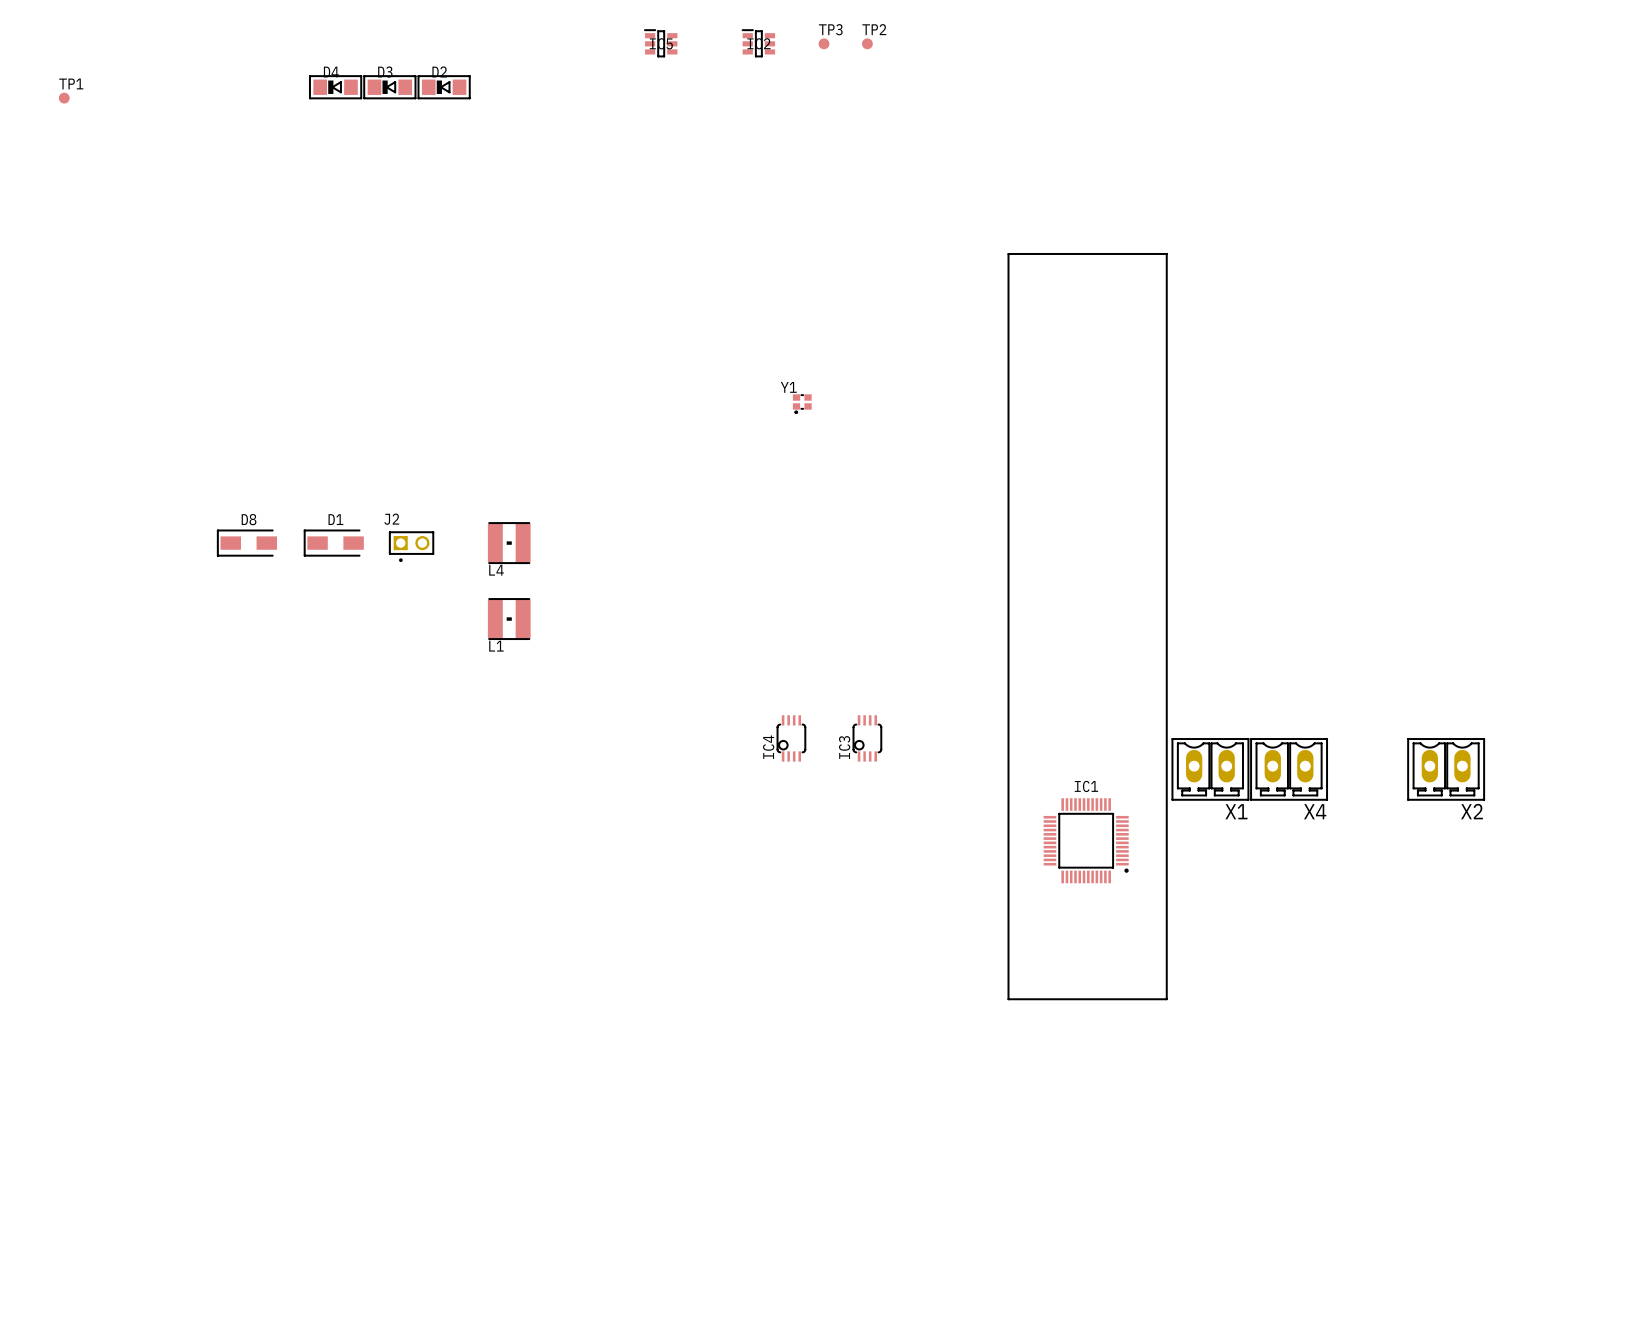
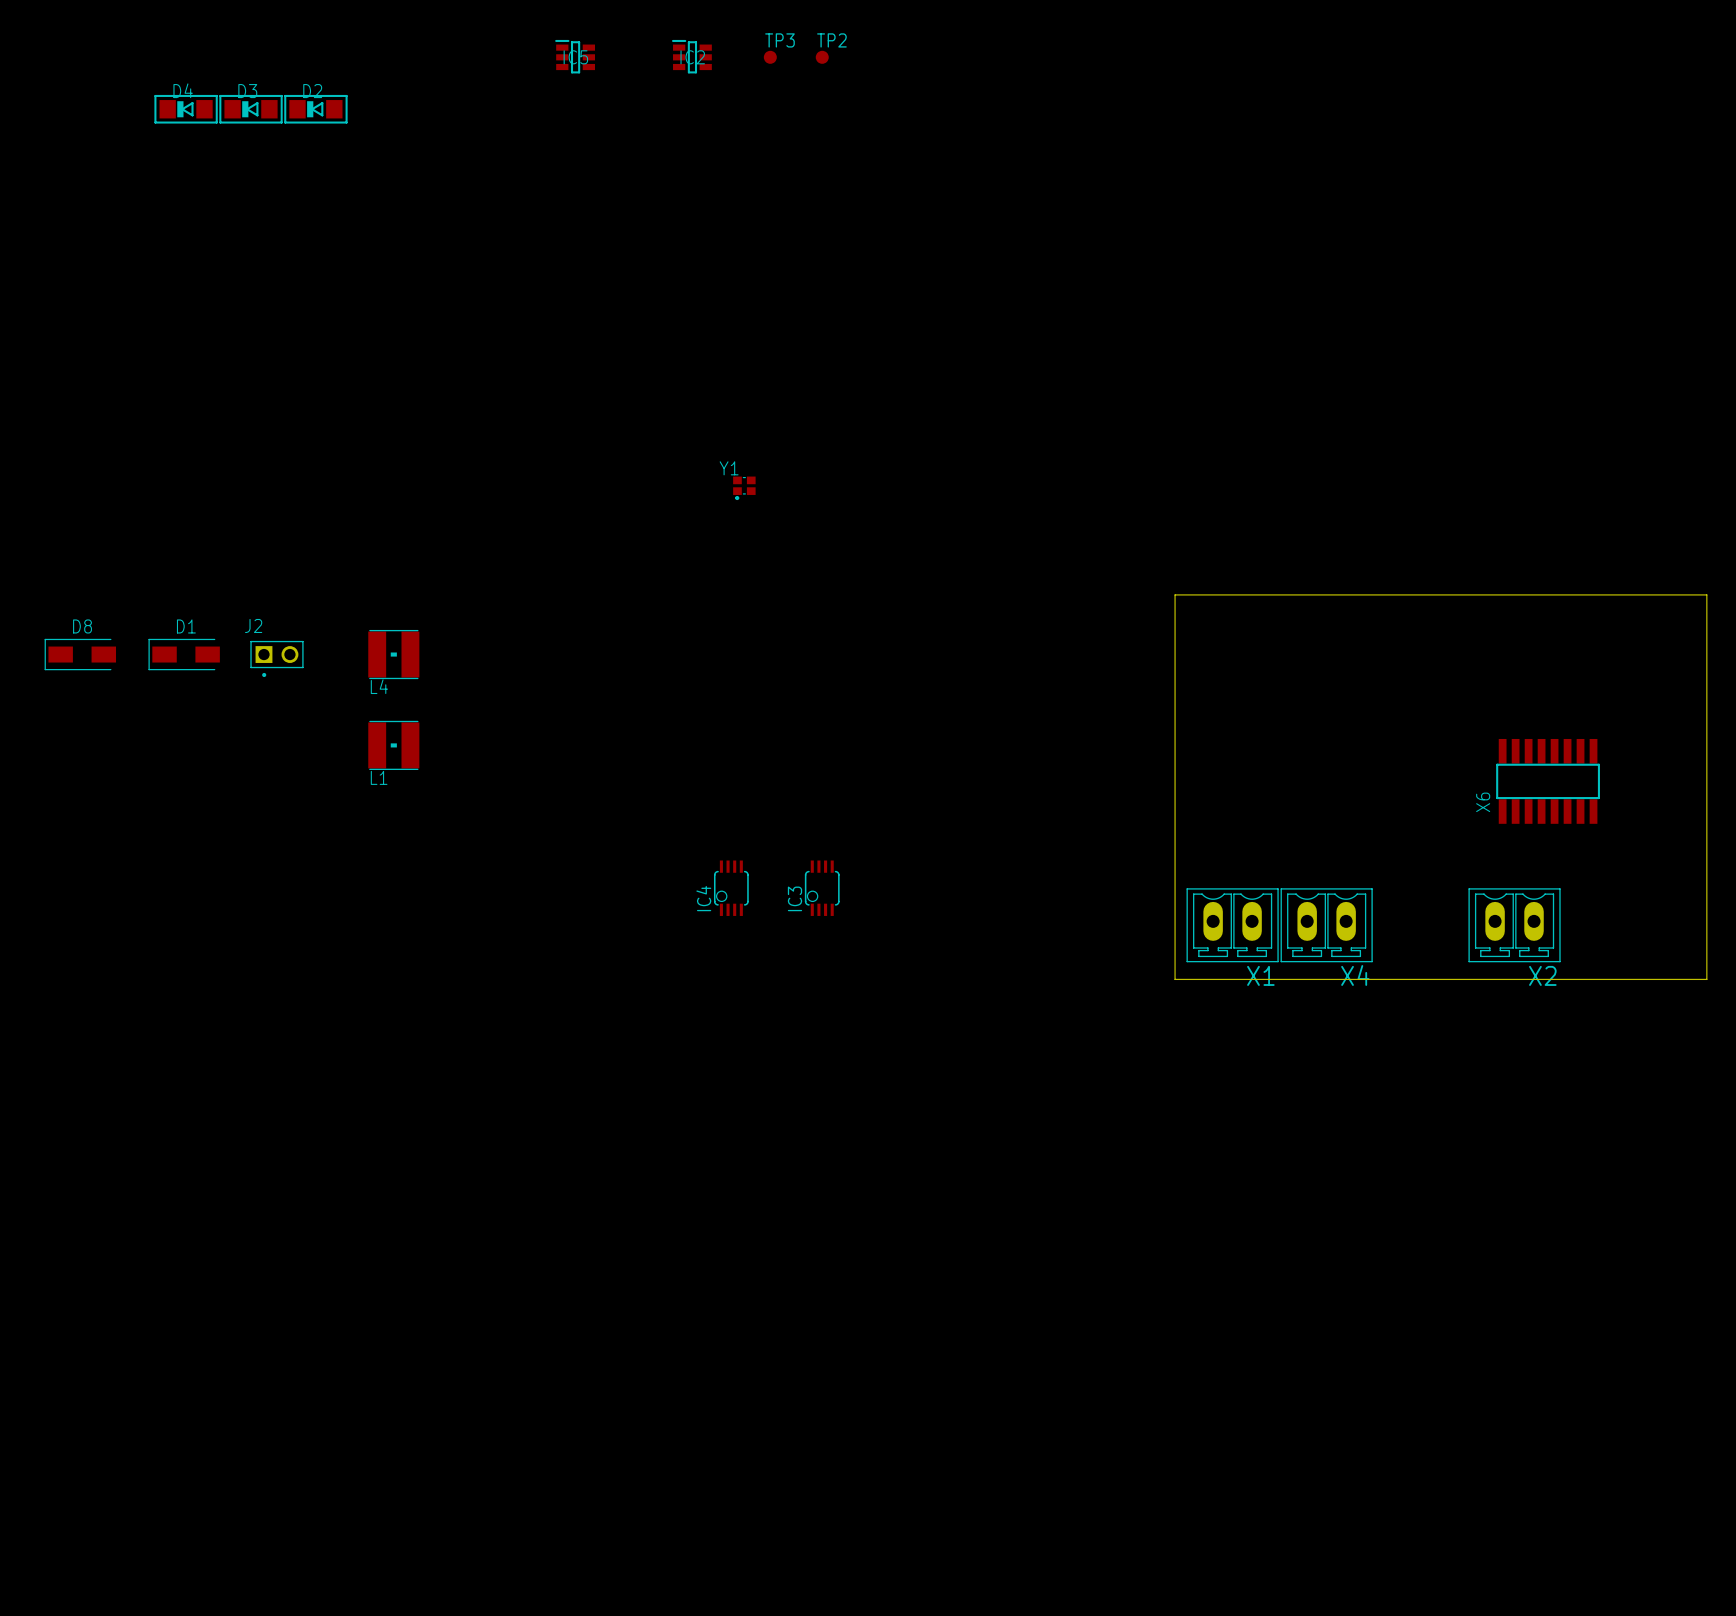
board edge: (1008, 253) (1166, 253) (1166, 999) (1008, 999) (1008, 253) -> none
board edge: none -> (1175, 594) (1706, 594) (1706, 979) (1175, 979) (1175, 594)
X6: none -> (1548, 781)
IC1: (1086, 840) -> none

